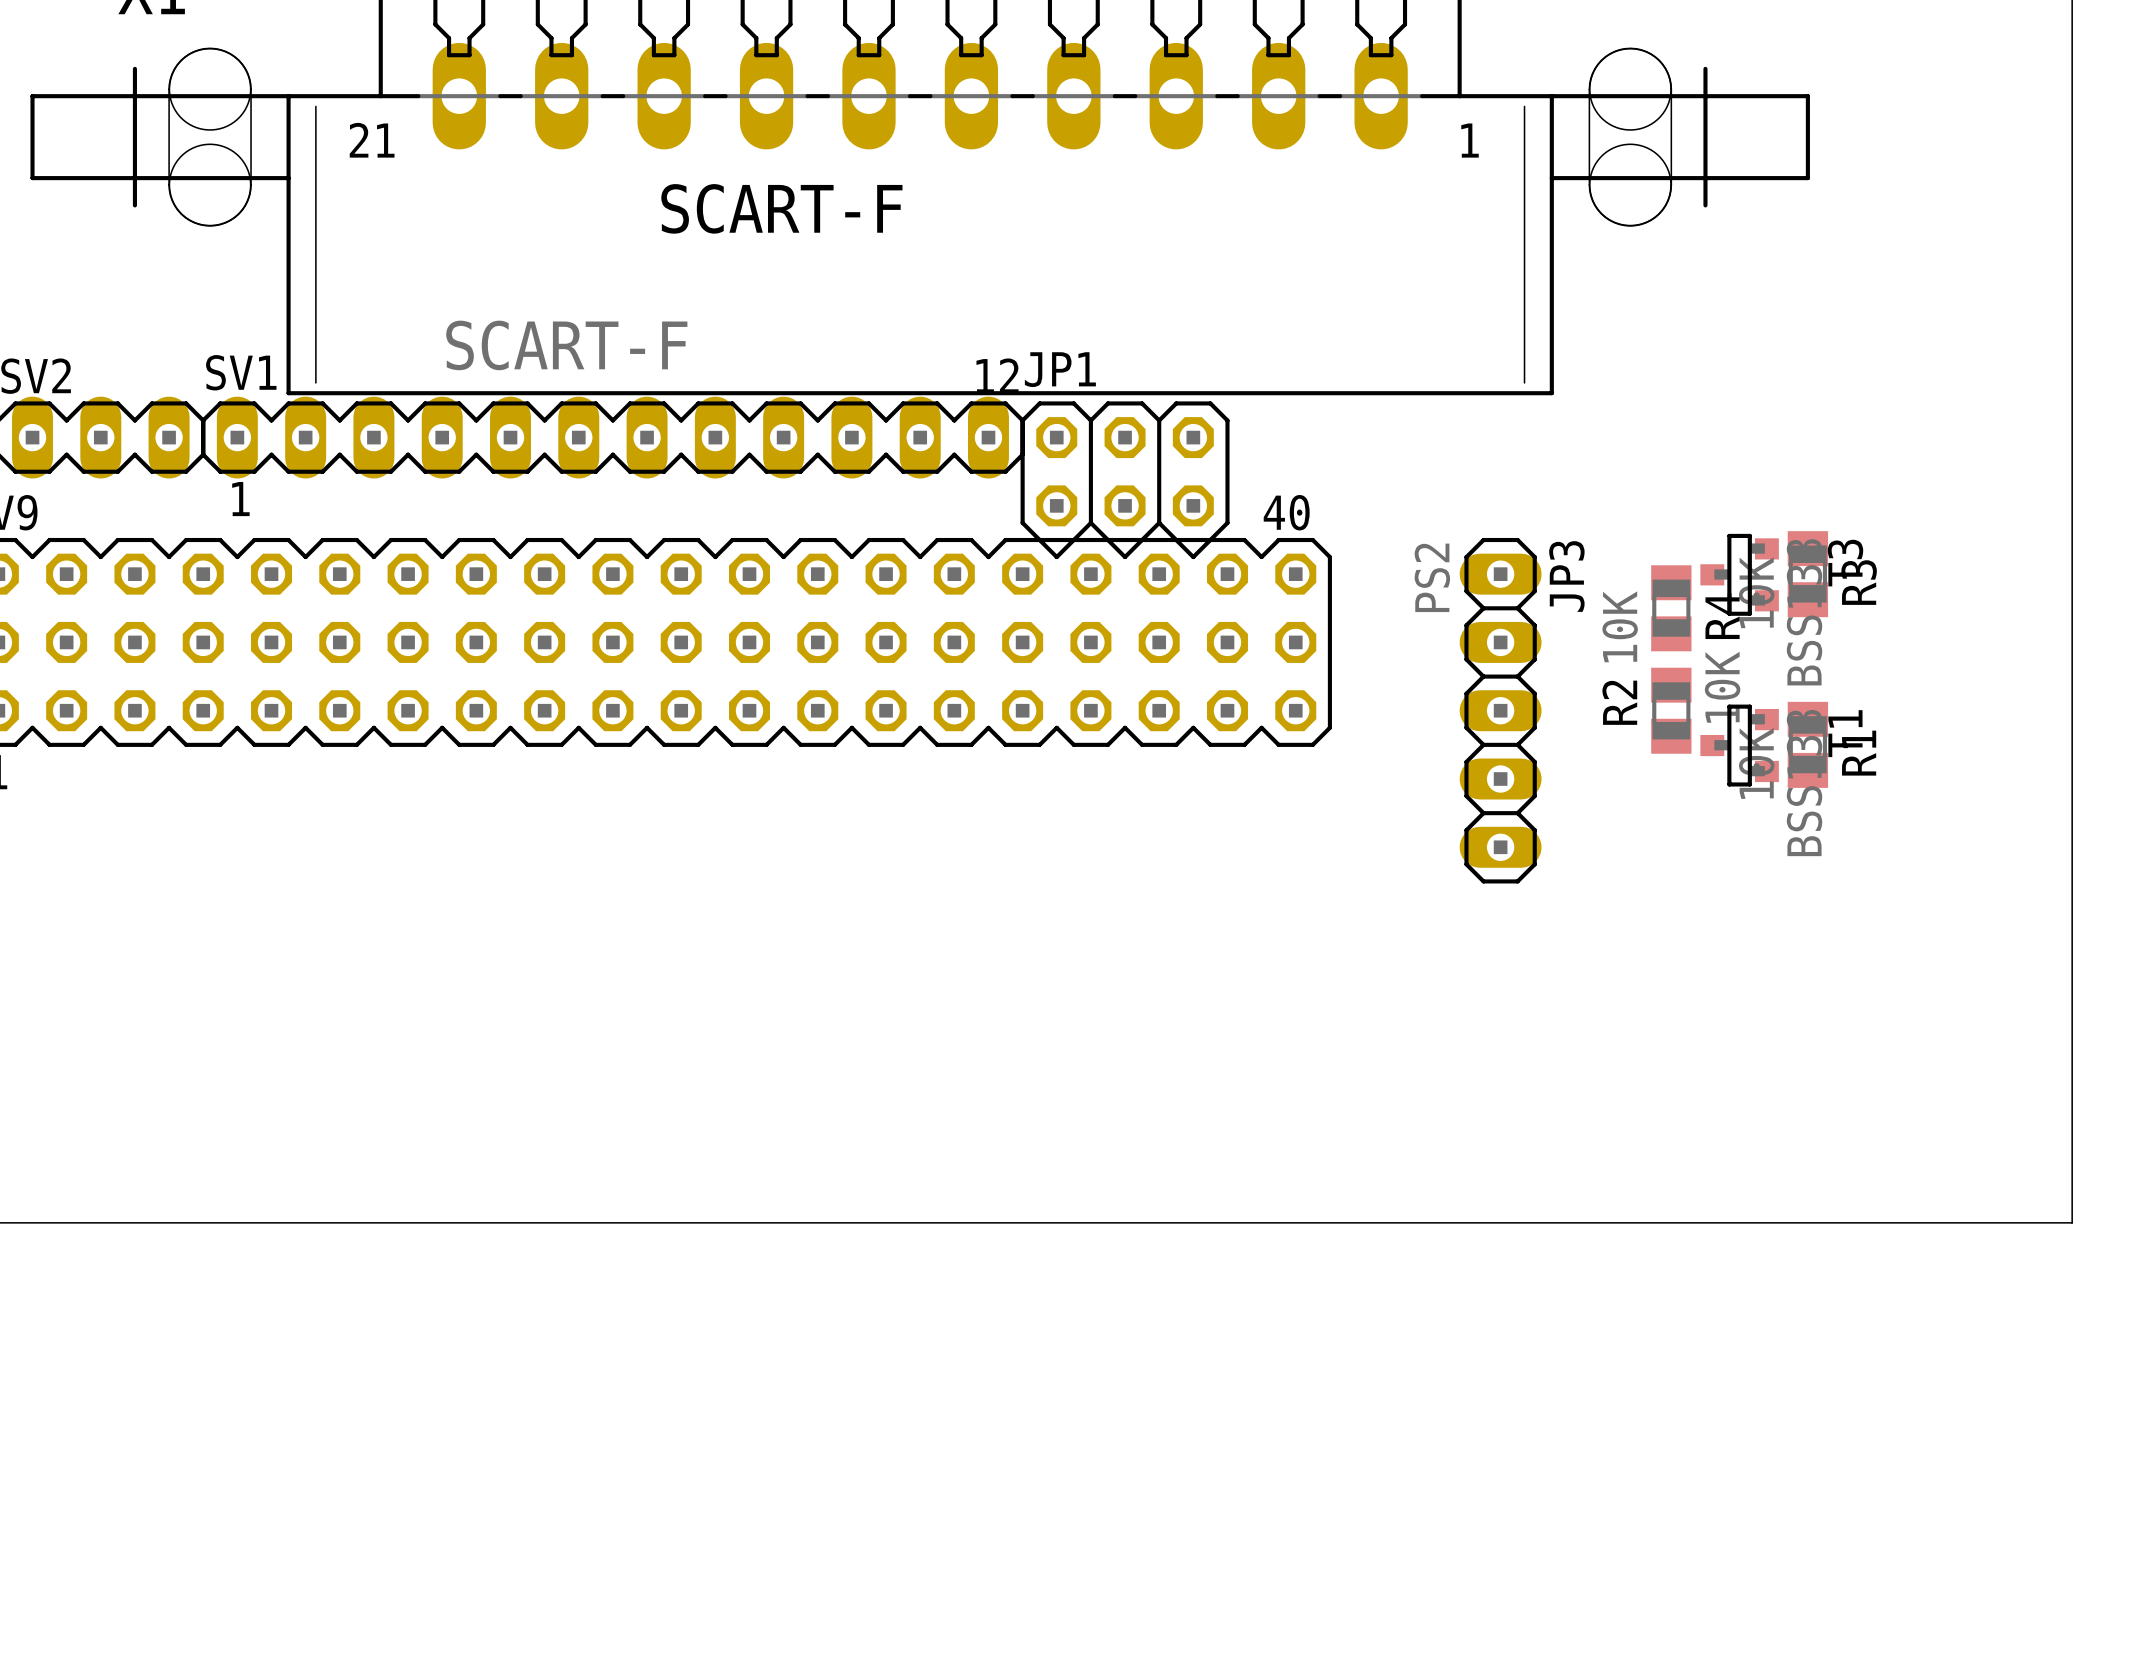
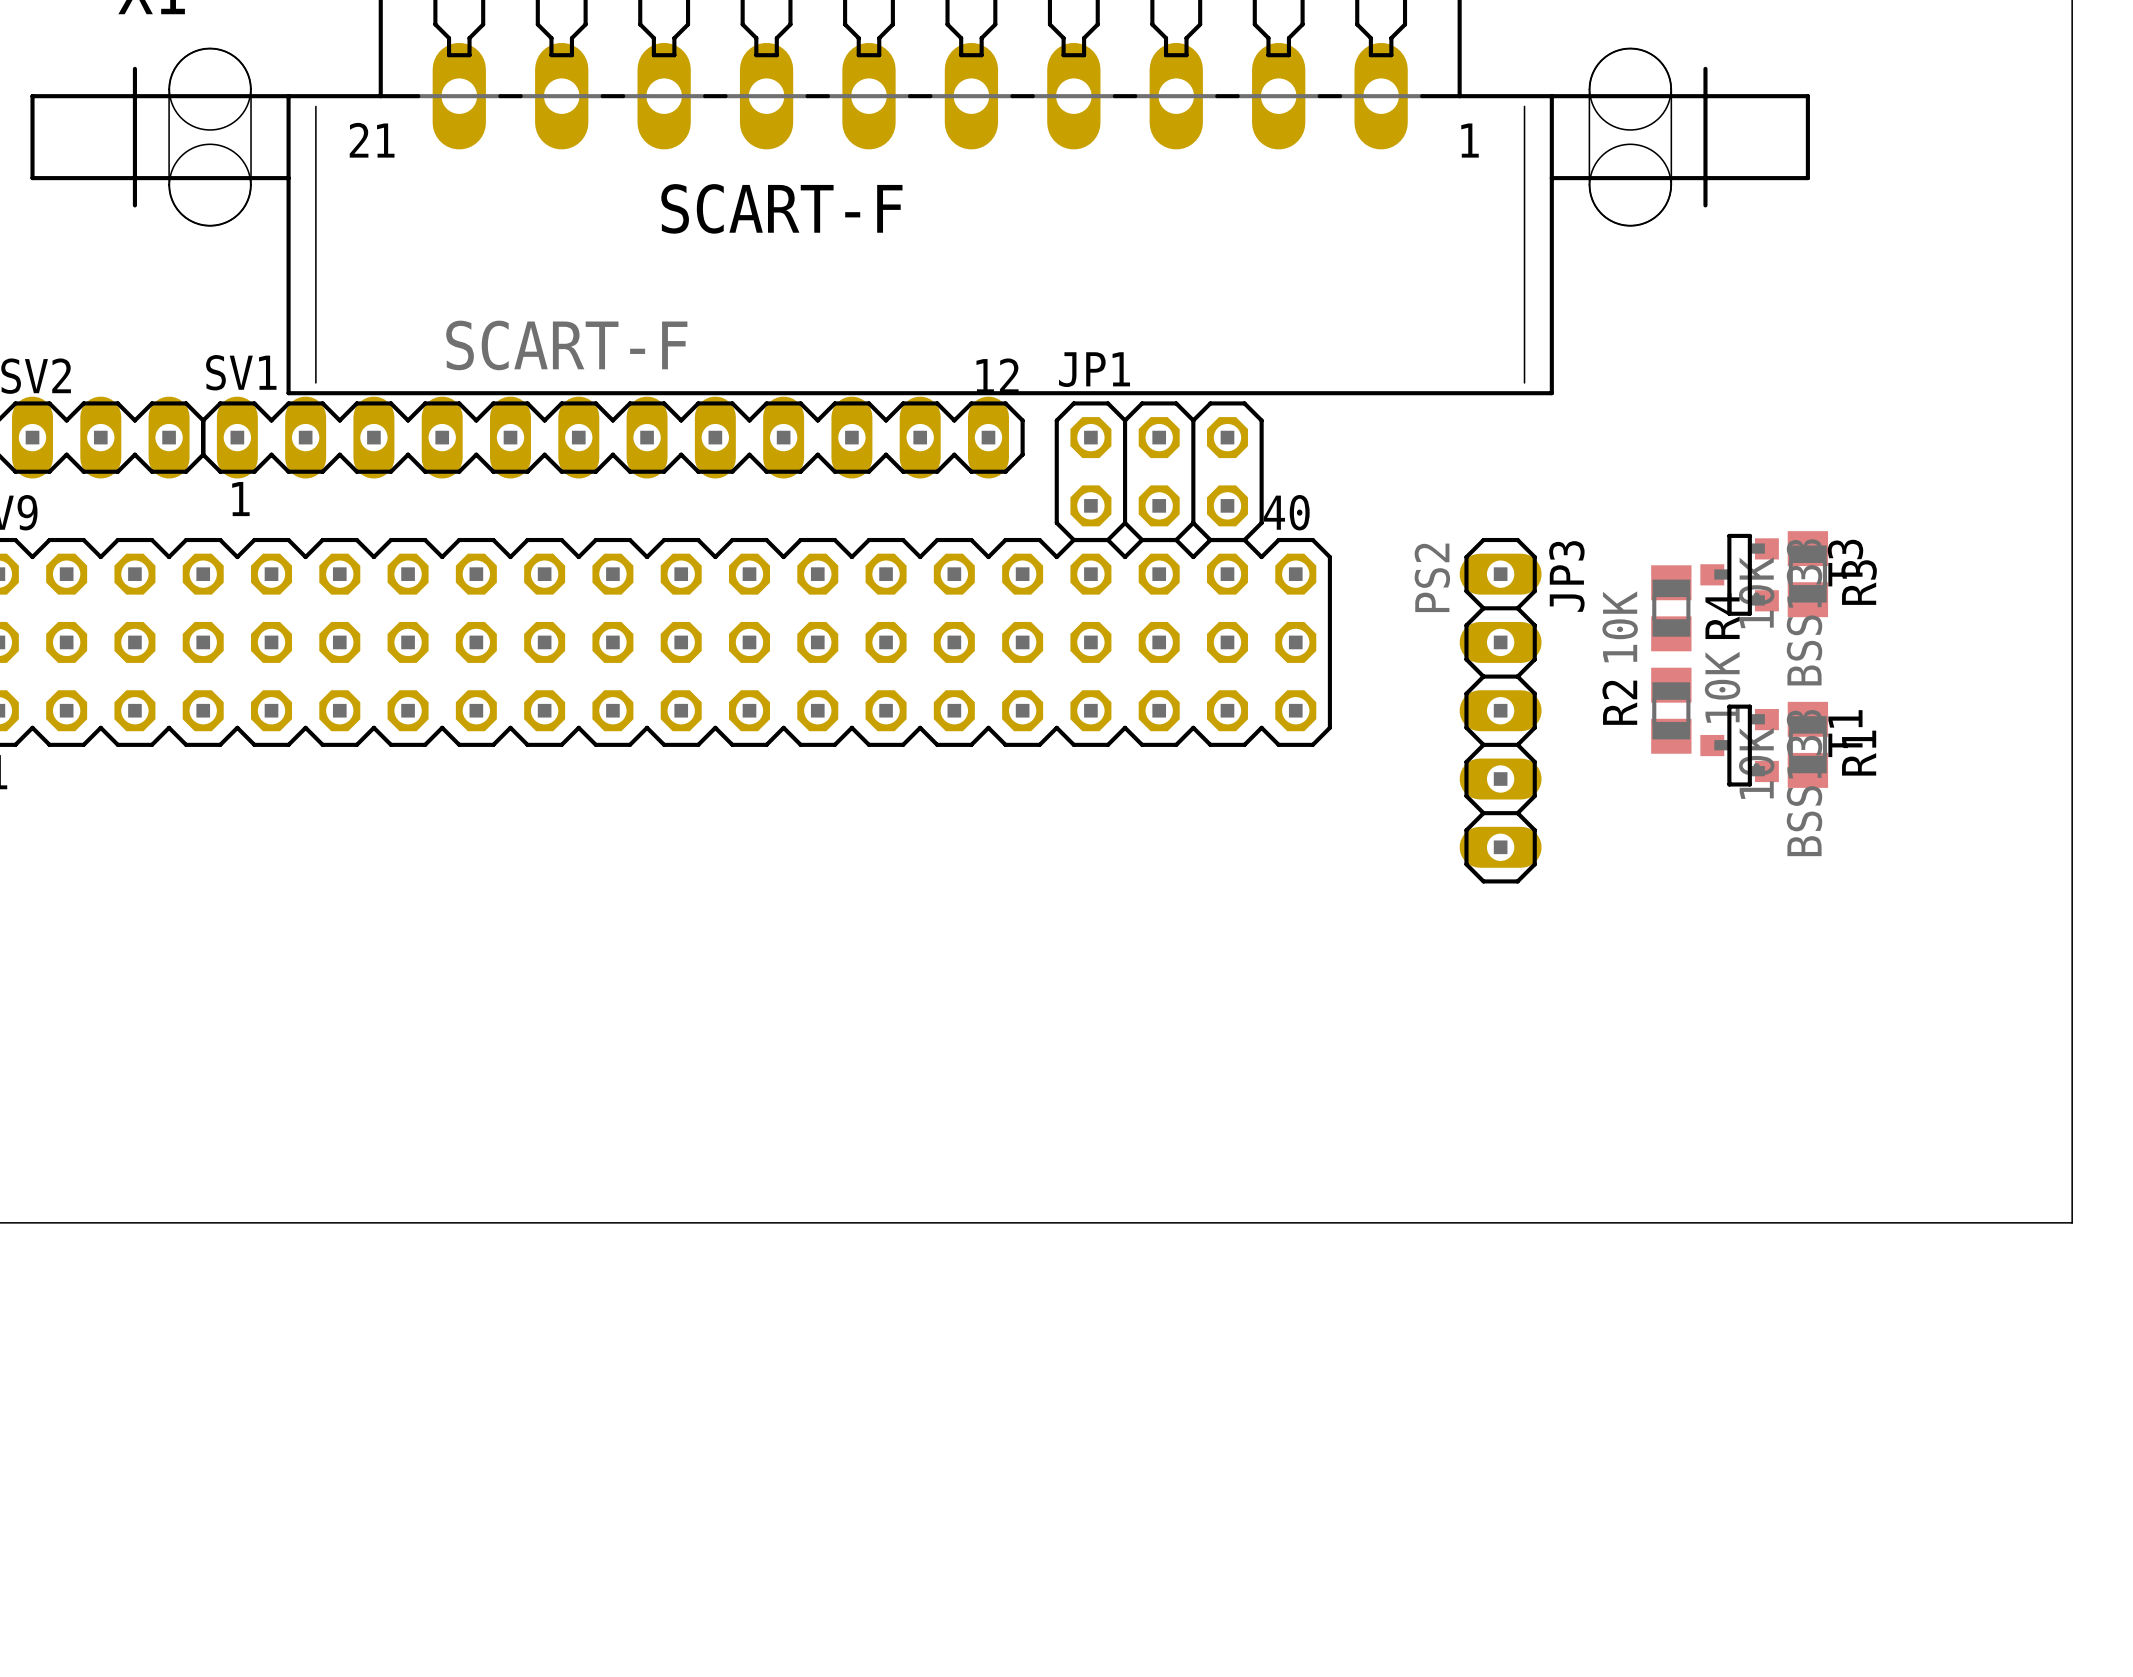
JP1 position: (1125, 471) -> (1159, 471)

